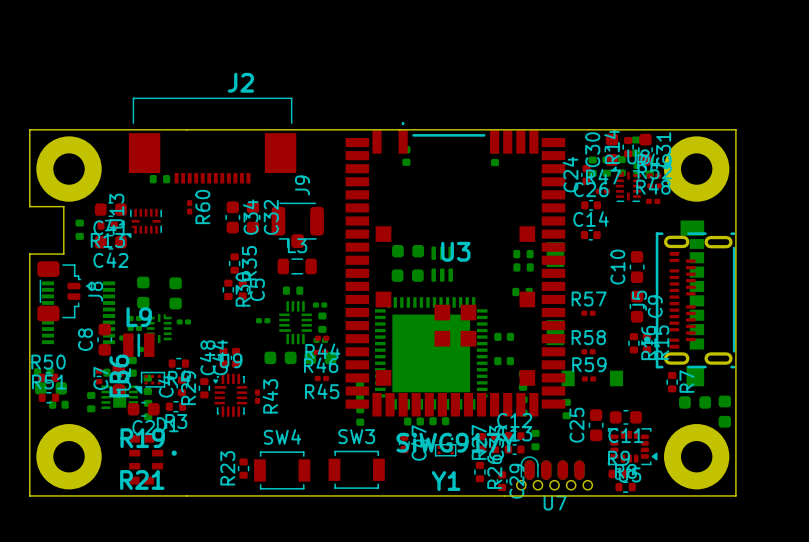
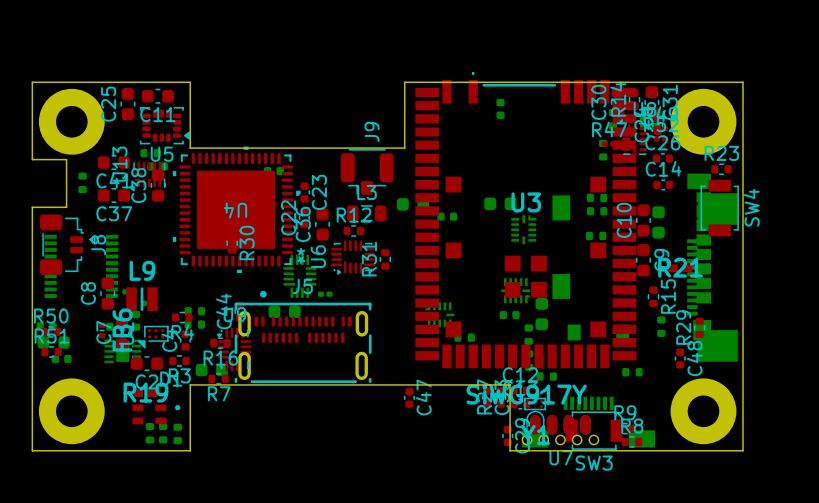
board edge: (186, 129) (399, 129) -> (190, 82) (190, 148) (404, 148) (404, 82)
J2: (212, 140) -> none
part: (635, 146) -> none
part: (406, 155) -> none
part: (592, 166) -> none
part: (621, 166) -> none
C24 position: (586, 174) -> (657, 125)
part: (159, 179) -> none
part: none -> (603, 150)
part: none -> (150, 153)
R48: (653, 201) -> none
C26 position: (591, 205) -> (662, 158)
R60: (189, 207) -> none
part: none -> (157, 166)
C34: (232, 217) -> none
C32: (253, 217) -> none
part: none -> (273, 171)
R13: (107, 225) -> none
J9 position: (297, 225) -> (367, 171)
C14 position: (590, 235) -> (663, 184)
part: none -> (597, 197)
part footprint: [431, 246, 454, 282] -> [437, 212, 458, 221]
part: none -> (500, 203)
part: (523, 254) -> none
U4: none -> (236, 209)
part: none -> (597, 211)
C42 name: C42 (110, 260) -> C37 (114, 213)
R35: (234, 263) -> none
L3 position: (297, 266) -> (366, 213)
part: (523, 267) -> none
U3 position: (455, 269) -> (525, 220)
part: none -> (658, 222)
C38 side: bottom (407, 275) -> top (158, 185)
part: none -> (523, 229)
part: none -> (596, 236)
C5: (242, 289) -> none
R31 side: bottom (293, 290) -> top (385, 259)
part: (143, 292) -> none
part: (522, 292) -> none
part: (175, 293) -> none
part footprint: [375, 297, 488, 410] -> [425, 302, 455, 328]
J5 rotation: 0° (689, 300) -> 90° clockwise (303, 336)
J5 position: (689, 300) -> (303, 336)
U6: none -> (353, 257)
part: (320, 305) -> none
R57: (588, 313) -> none
part: (134, 318) -> none
part: (263, 320) -> none
part: (183, 321) -> none
R12 side: bottom (322, 322) -> top (353, 231)
part: none -> (712, 277)
part: (134, 328) -> none
part: (159, 328) -> none
part footprint: [494, 332, 515, 341] -> [501, 278, 531, 304]
R44: (322, 338) -> none
R16 rotation: 0° (633, 343) -> 90° clockwise (220, 343)
R16 position: (633, 343) -> (220, 343)
R58: (588, 351) -> none
R46: (320, 352) -> none
part: none -> (194, 311)
C48 name position: C48 (207, 357) -> C48 (694, 358)
C48 position: (223, 357) -> (680, 358)
C36 side: bottom (320, 358) -> top (322, 224)
part: none -> (541, 314)
part: none -> (194, 324)
part: none -> (661, 326)
R45: (321, 378) -> none
R59: (589, 378) -> none
R7 rotation: 0° (672, 382) -> 90° clockwise (218, 378)
R7 position: (672, 382) -> (218, 378)
part: none -> (464, 337)
part: (147, 384) -> none
R29 position: (204, 388) -> (699, 327)
part: (359, 390) -> none
R43: (257, 396) -> none
part: (91, 402) -> none
part: (695, 402) -> none
part: (148, 409) -> none
part: (566, 409) -> none
part: (724, 411) -> none
part: none -> (211, 369)
part: (360, 415) -> none
C11 position: (625, 417) -> (157, 96)
part: none -> (632, 372)
C23 side: bottom (413, 421) -> top (304, 192)
C22 side: bottom (439, 421) -> top (304, 217)
C25 position: (596, 425) -> (127, 104)
SW3 name position: SW3 (356, 436) -> SW3 (594, 463)
part: (535, 440) -> none
Y1 position: (445, 446) -> (535, 400)
U5 position: (632, 446) -> (164, 125)
part: none -> (588, 422)
R23 rotation: 0° (243, 468) -> 90° clockwise (721, 169)
R23 position: (243, 468) -> (721, 169)
SW3 position: (356, 469) -> (594, 430)
SW4 rotation: 0° (282, 470) -> 90° clockwise (719, 208)
SW4 position: (282, 470) -> (719, 208)
R26 side: top (479, 472) -> bottom (546, 376)
part: none -> (149, 433)
part: none -> (163, 433)
part: none -> (177, 433)
R21 position: (141, 480) -> (680, 268)
board edge: (186, 495) (504, 495) -> (190, 450) (190, 384) (510, 384) (510, 450)

